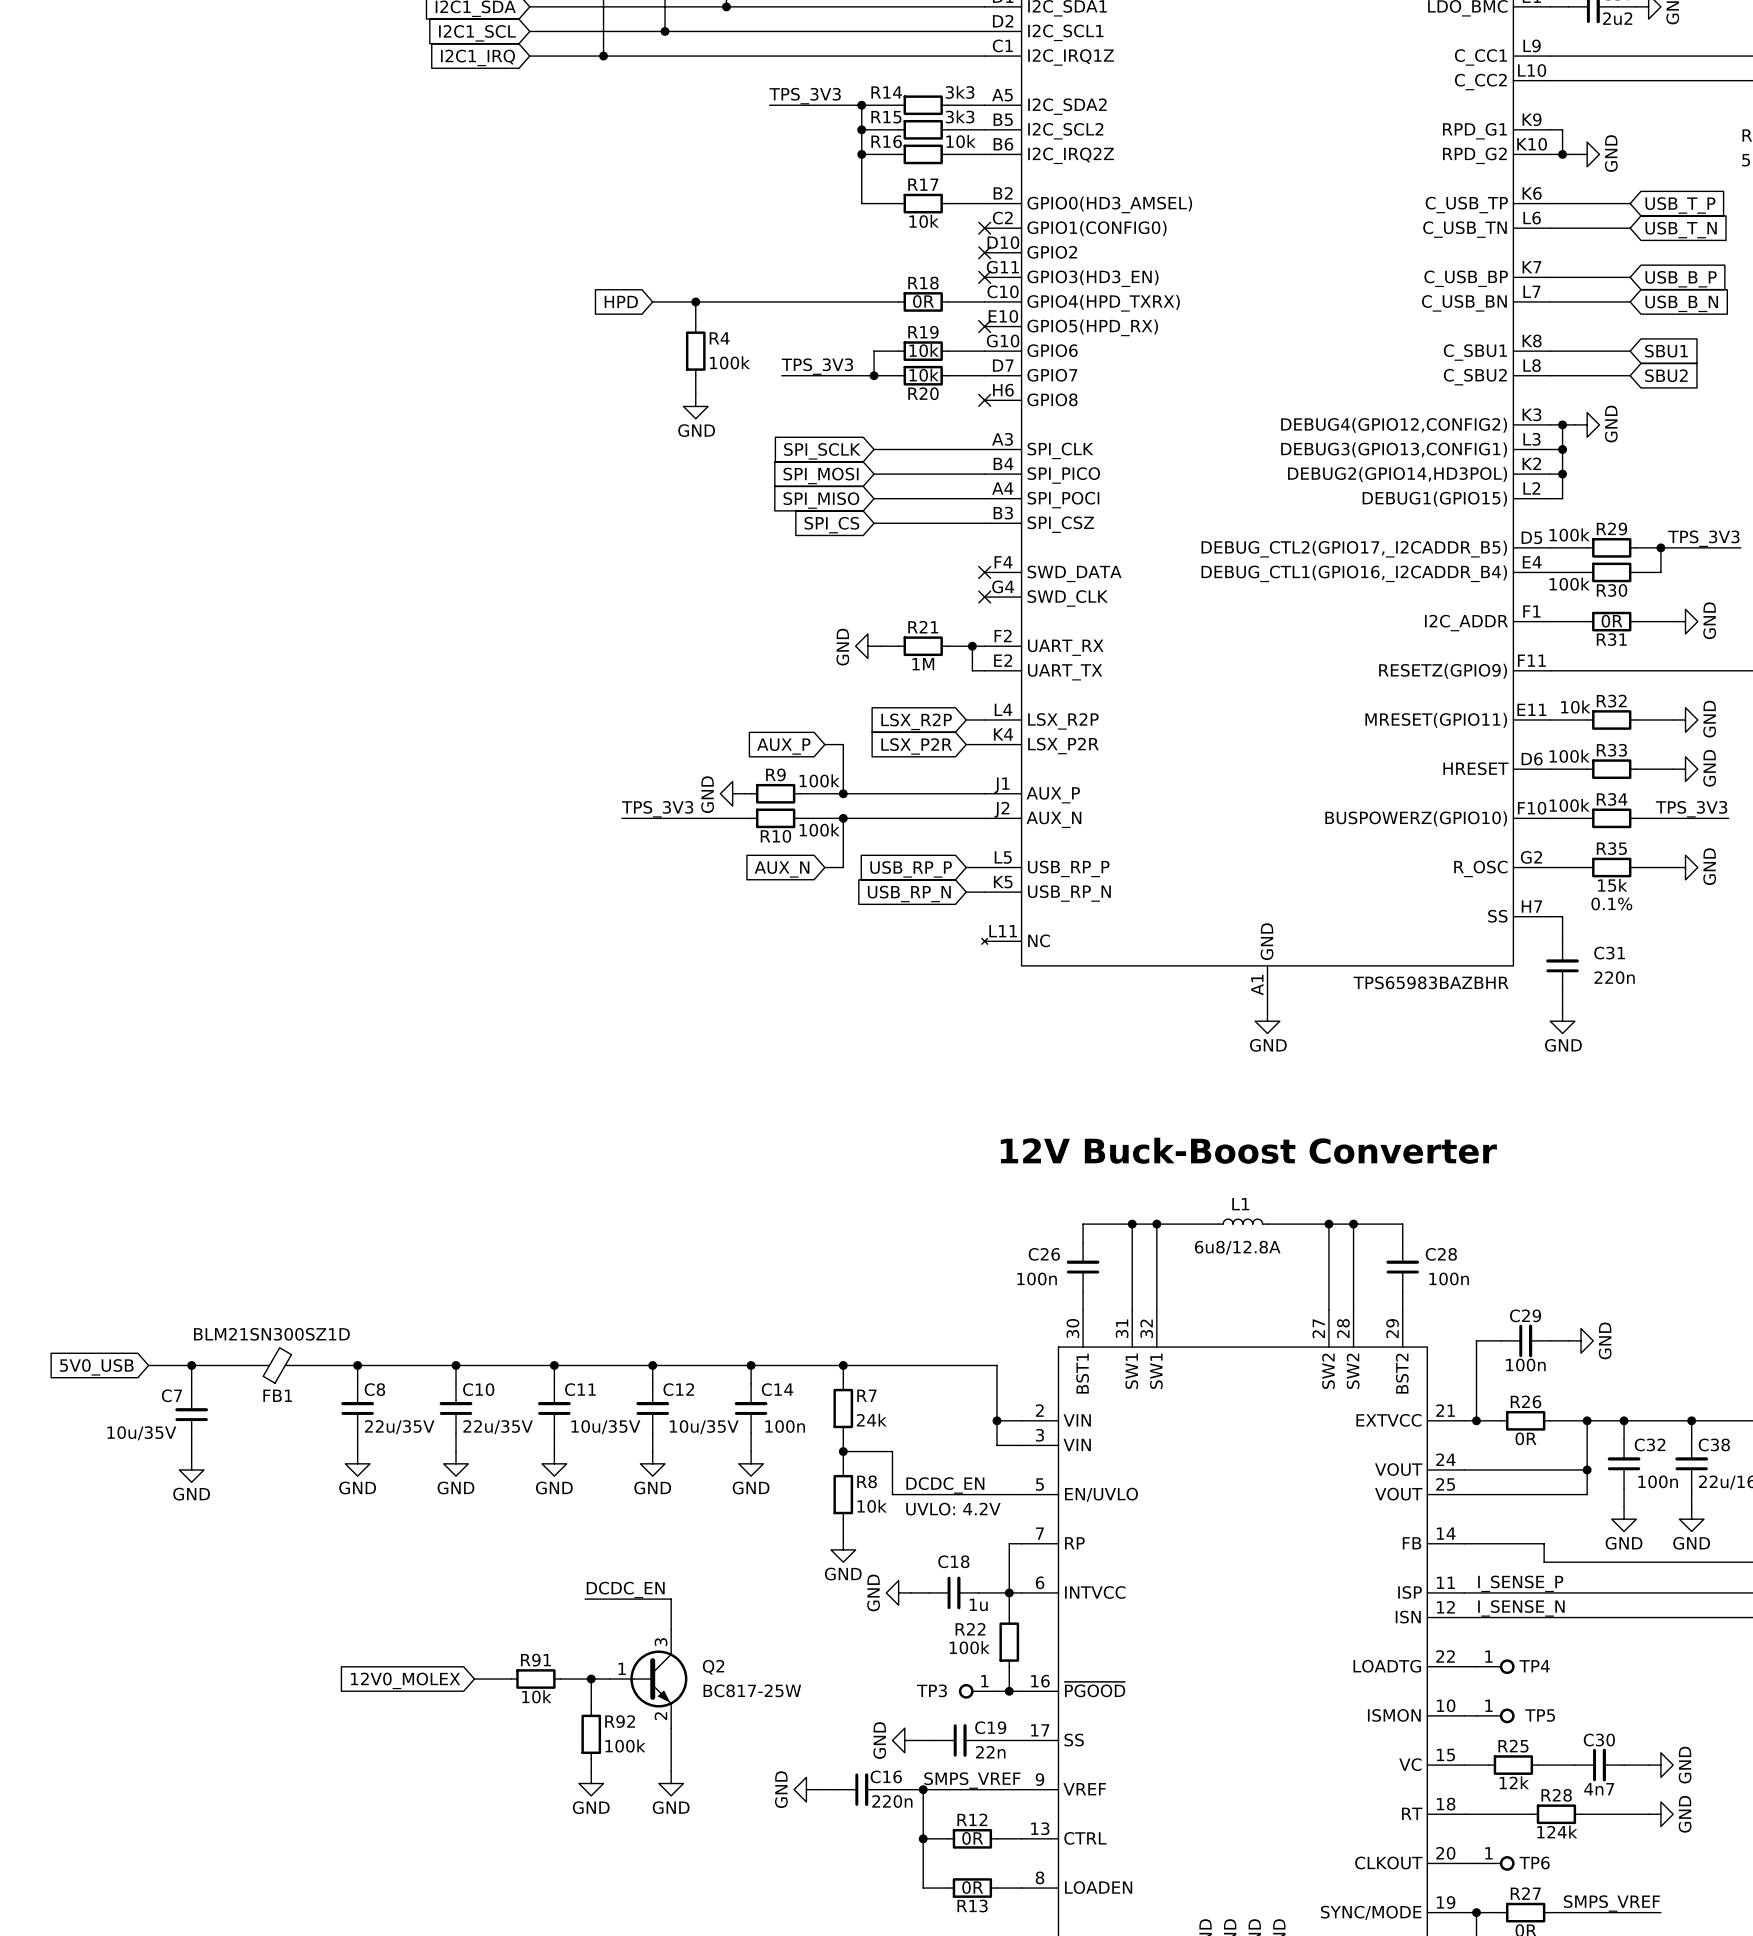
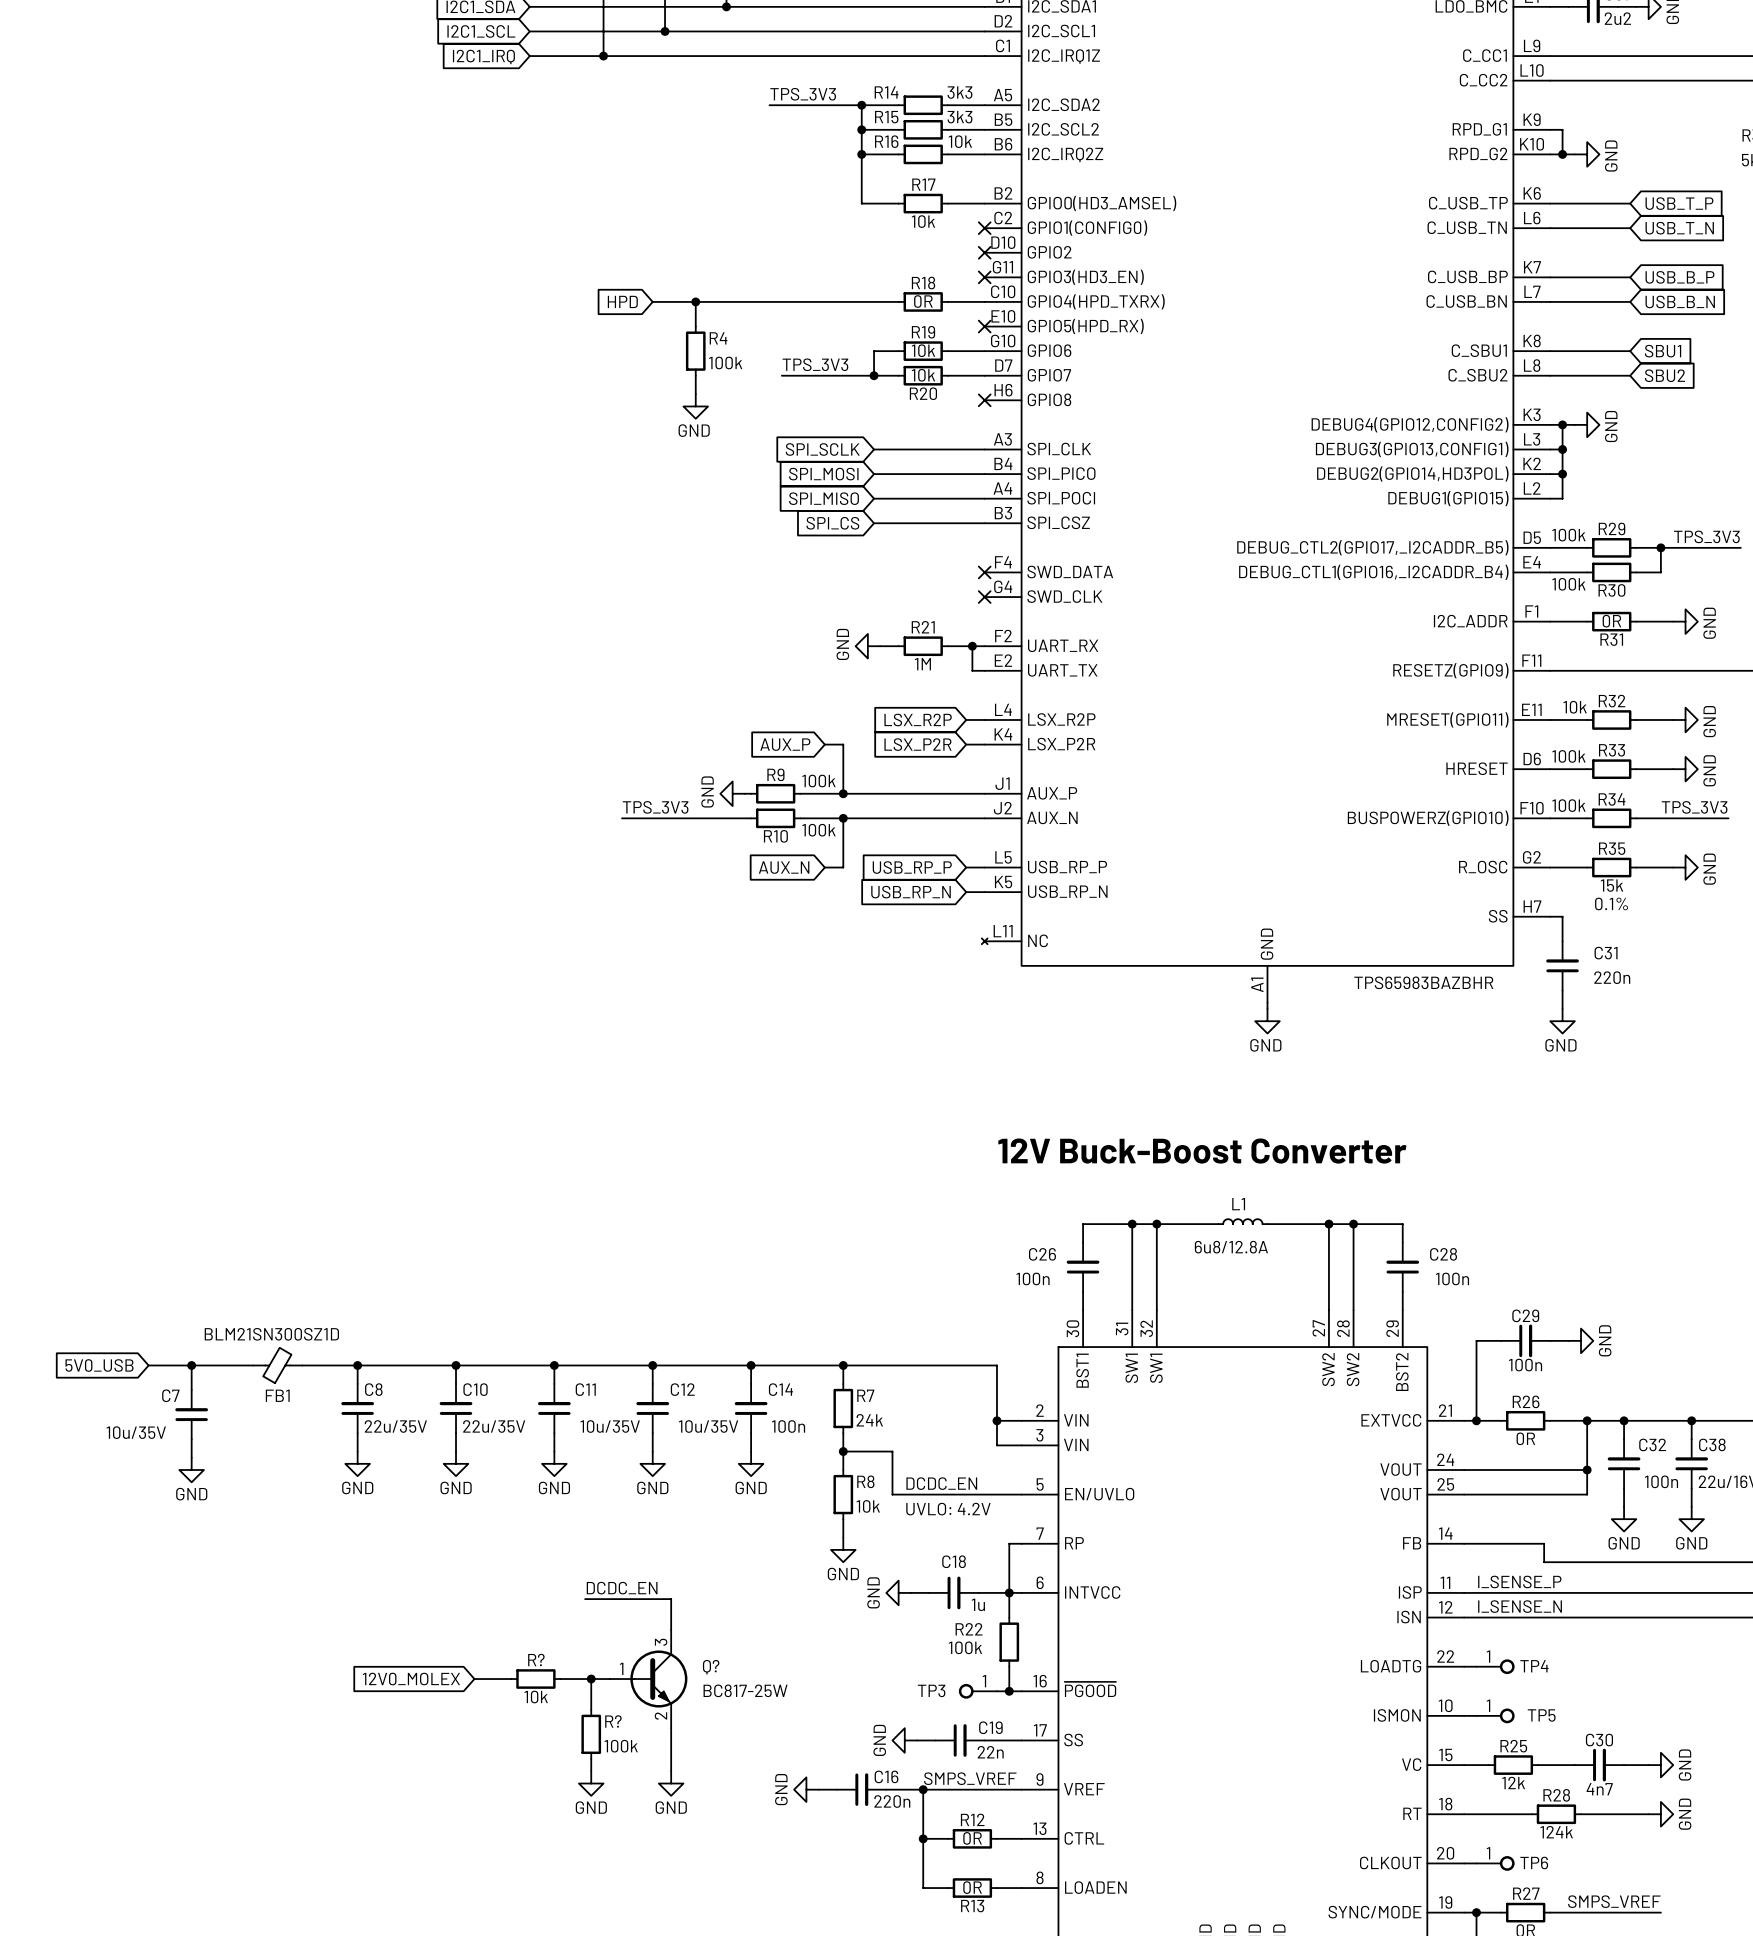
R91 name: R91 (535, 1660) -> R? (536, 1660)
Q2 name: Q2 (713, 1667) -> Q? (711, 1667)
R92 name: R92 (620, 1721) -> R? (613, 1721)

